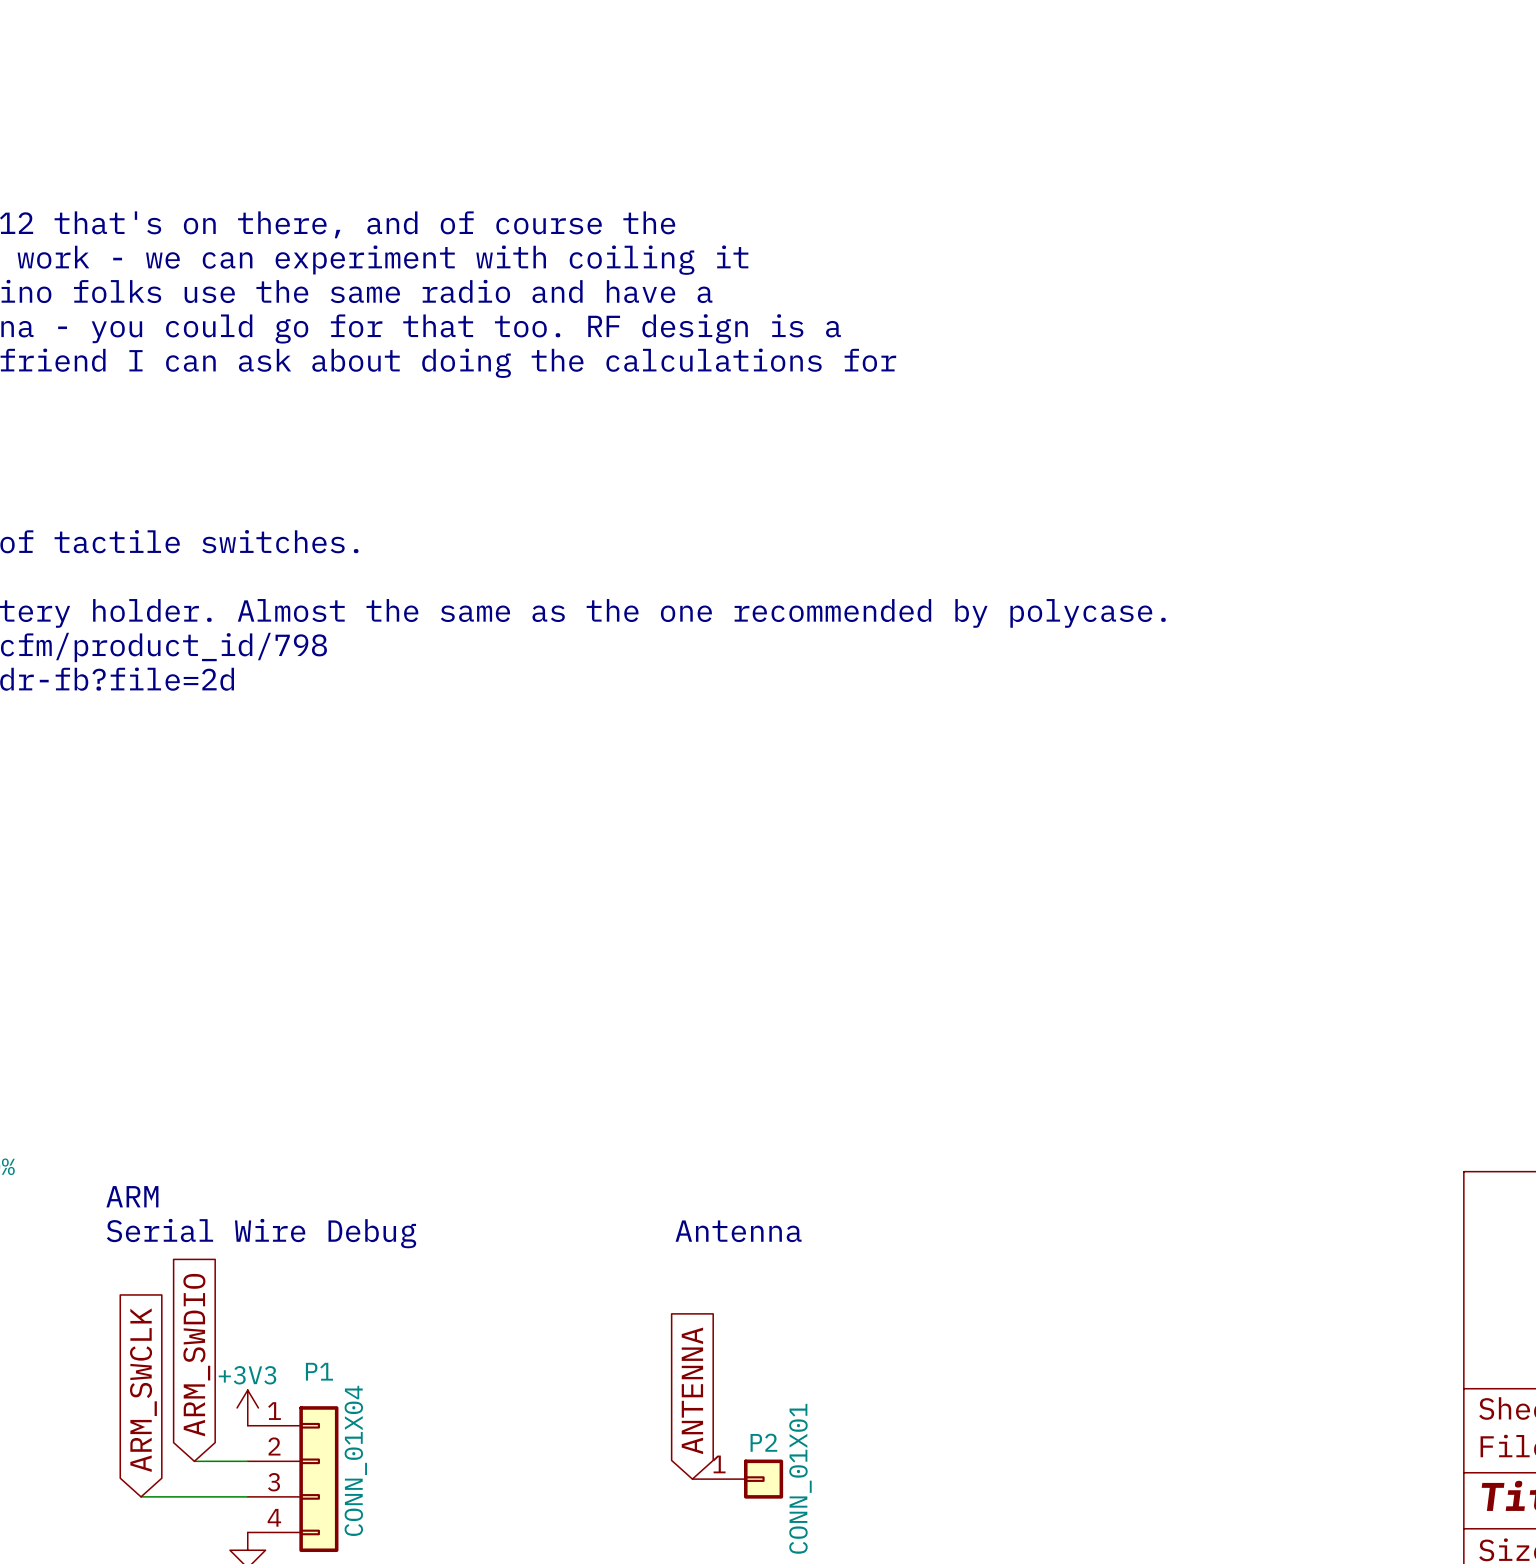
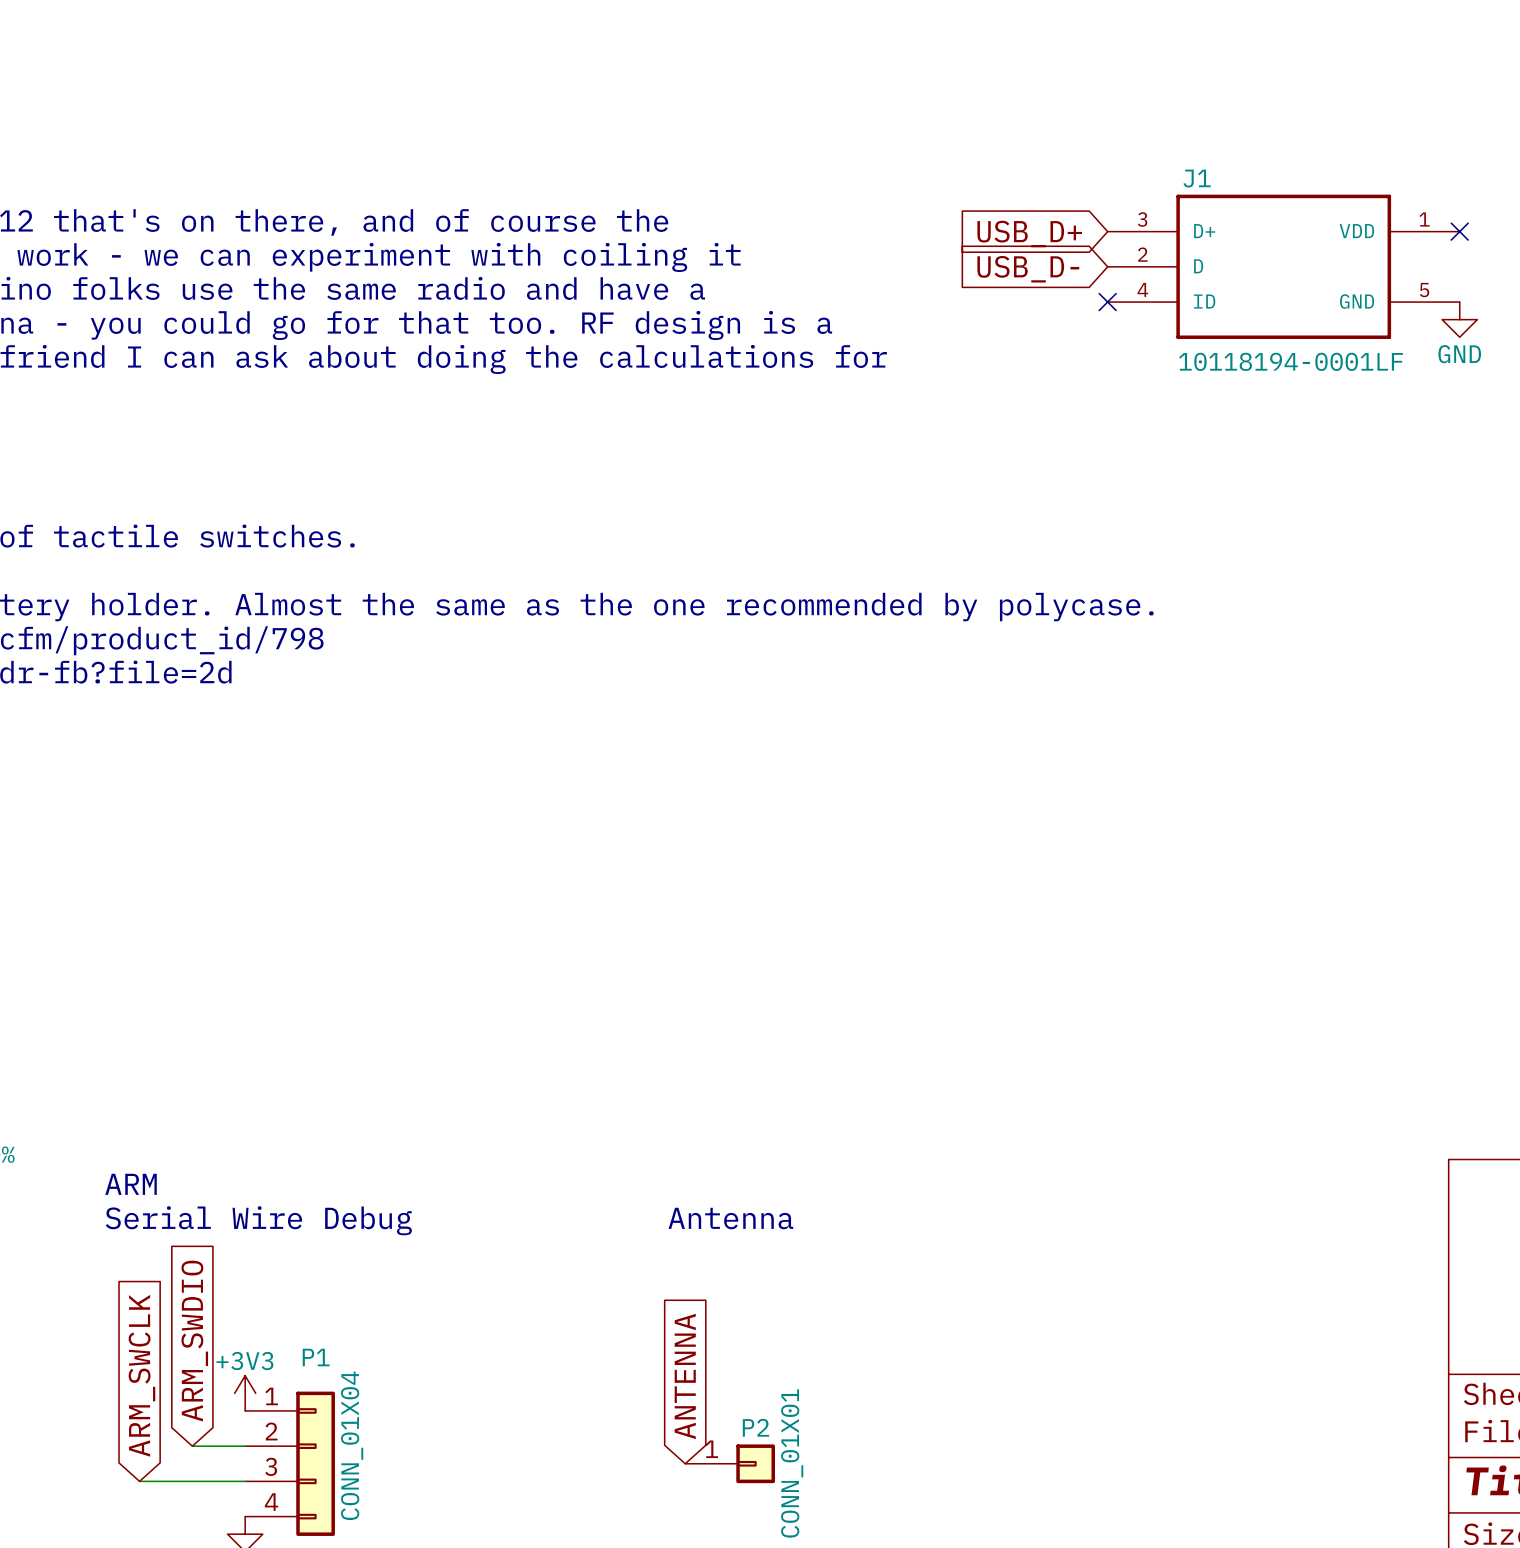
no-connect mark: none -> (1459, 231)
global label: none -> USB_D+ (1029, 234)
J1: none -> 10118194-0001LF (1283, 266)
global label: none -> USB_D- (1028, 269)
no-connect mark: none -> (1107, 302)
power symbol: none -> GND (1459, 319)

